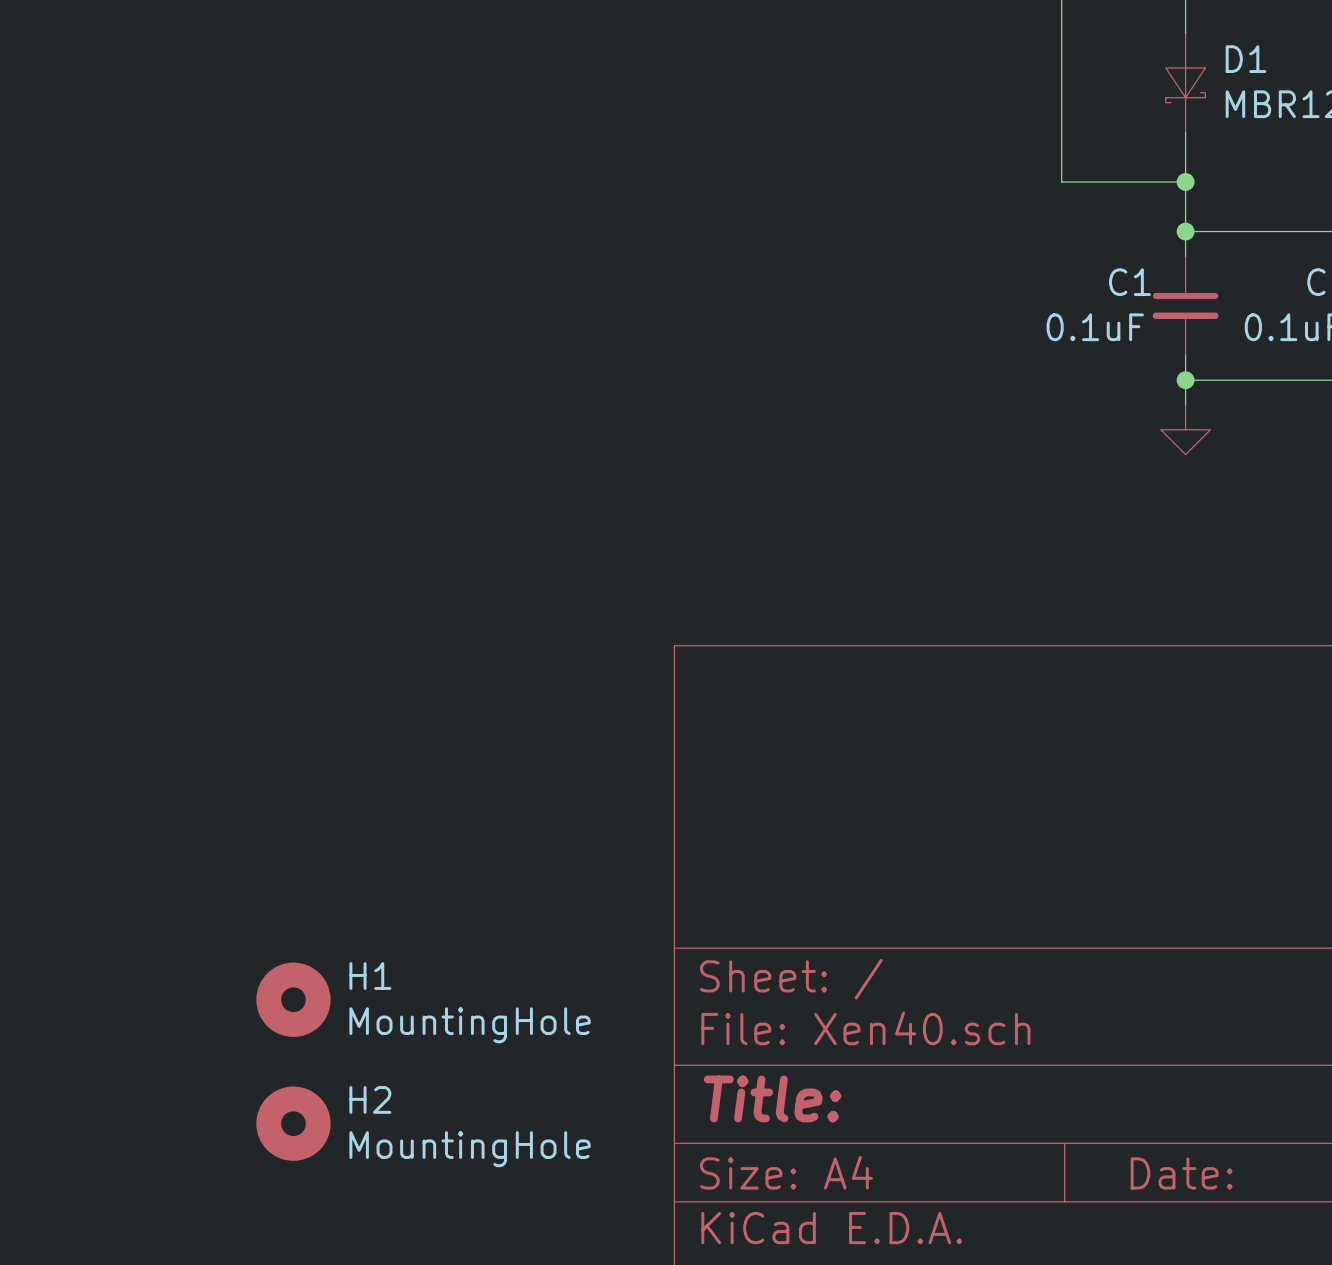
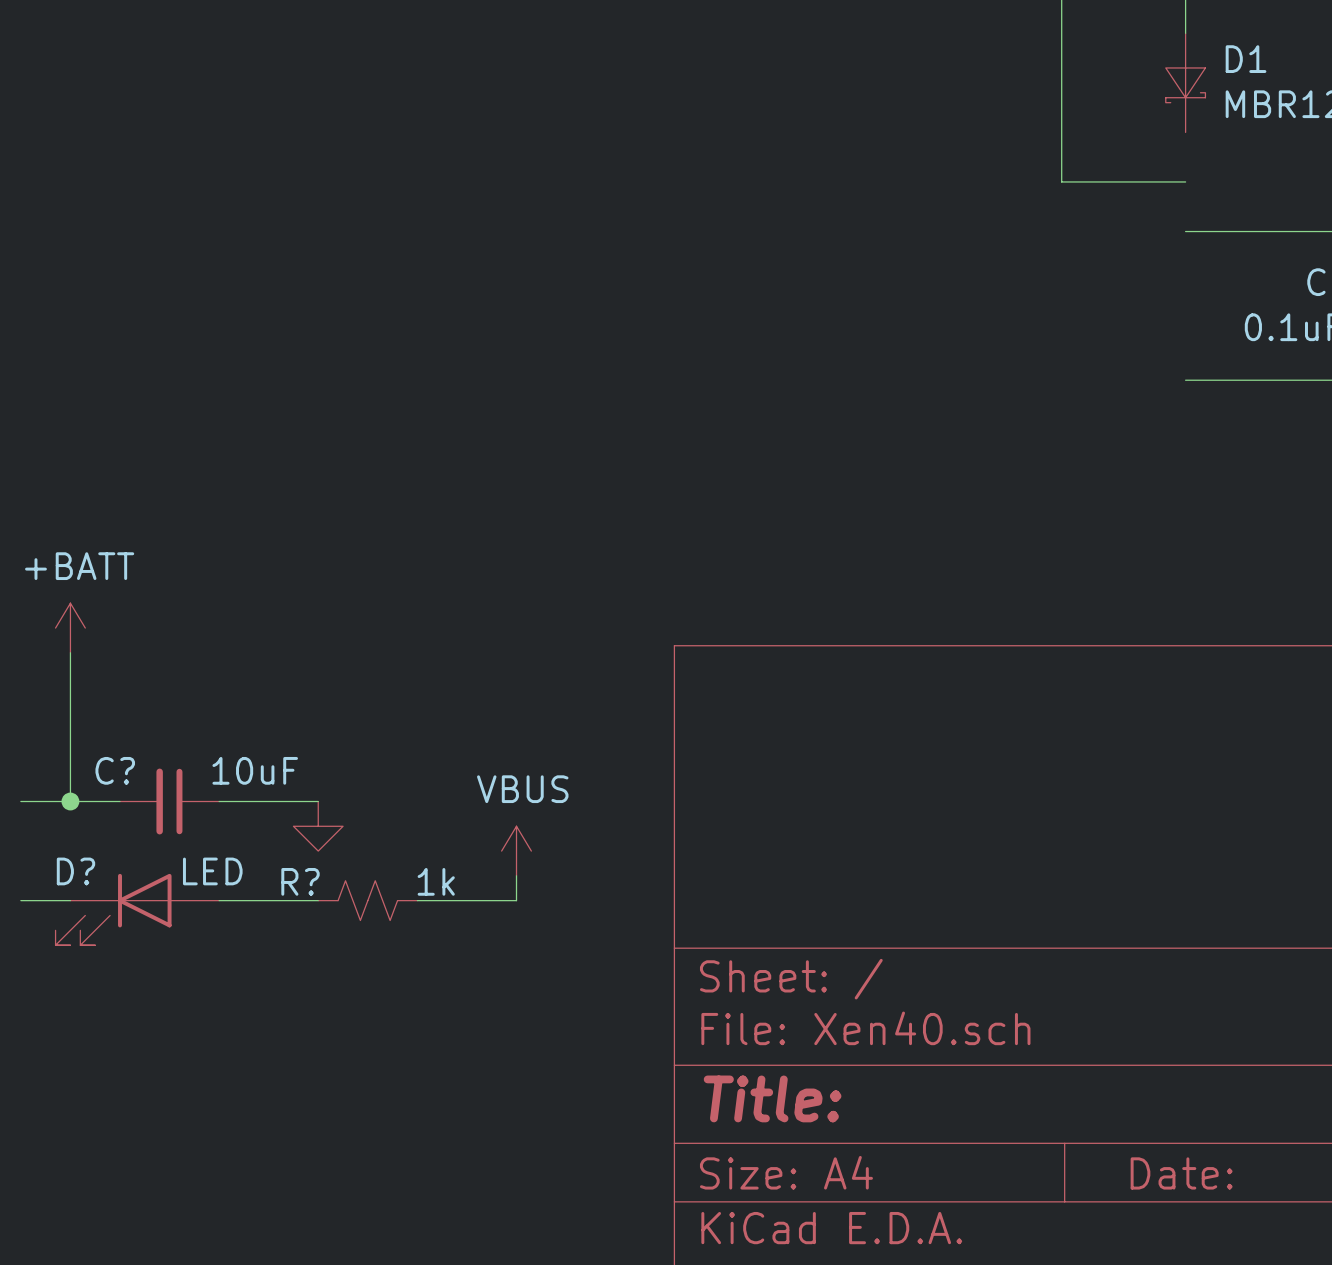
wire: (1185, 132) (1185, 256) -> none
junction: (1185, 181) -> none
junction: (1185, 231) -> none
C1: 0.1uF (1185, 305) -> none
wire: (1185, 355) (1185, 405) -> none
junction: (1185, 380) -> none
power symbol: (1185, 429) -> none
power symbol: none -> +BATT (70, 628)
wire: none -> (70, 652) (70, 801)
wire: none -> (20, 801) (120, 801)
junction: none -> (70, 801)
C?: none -> 10uF (169, 801)
wire: none -> (219, 801) (318, 801)
power symbol: none -> (318, 826)
power symbol: none -> VBUS (516, 851)
wire: none -> (516, 875) (516, 900) (417, 900)
wire: none -> (20, 900) (70, 900)
wire: none -> (219, 900) (318, 900)
R?: none -> 1k (367, 900)
D?: none -> LED (137, 909)
H1: MountingHole (293, 999) -> none
H2: MountingHole (293, 1123) -> none

